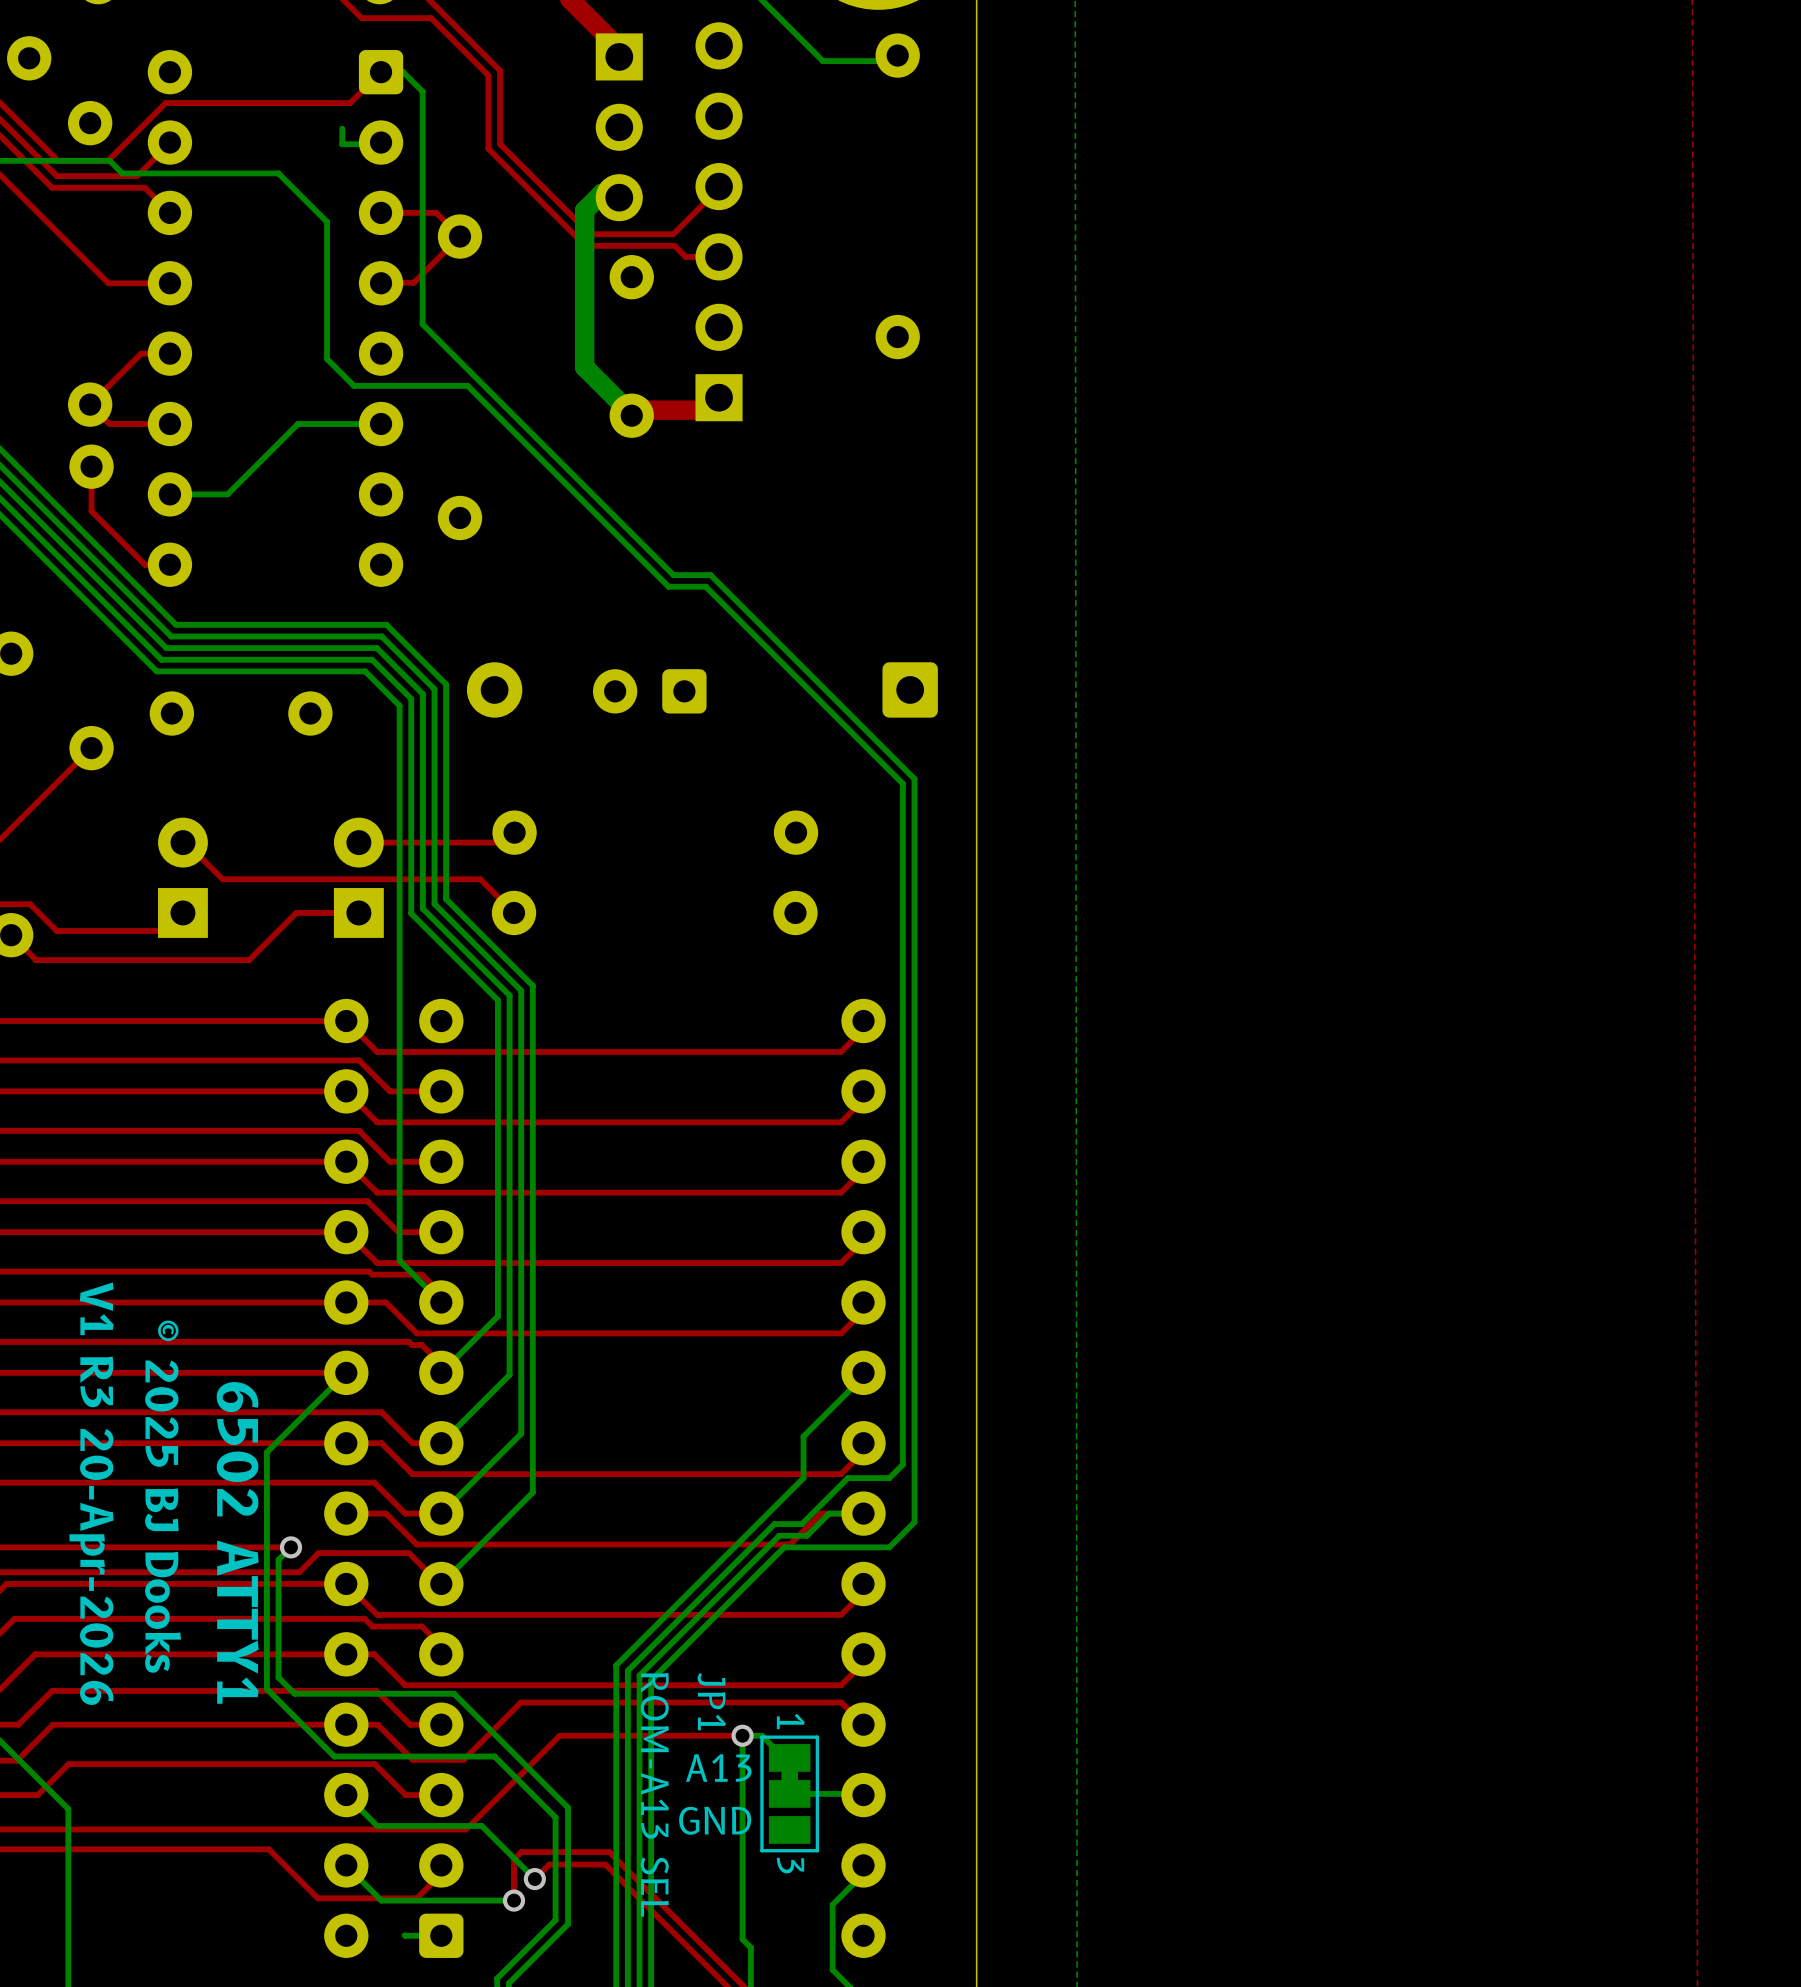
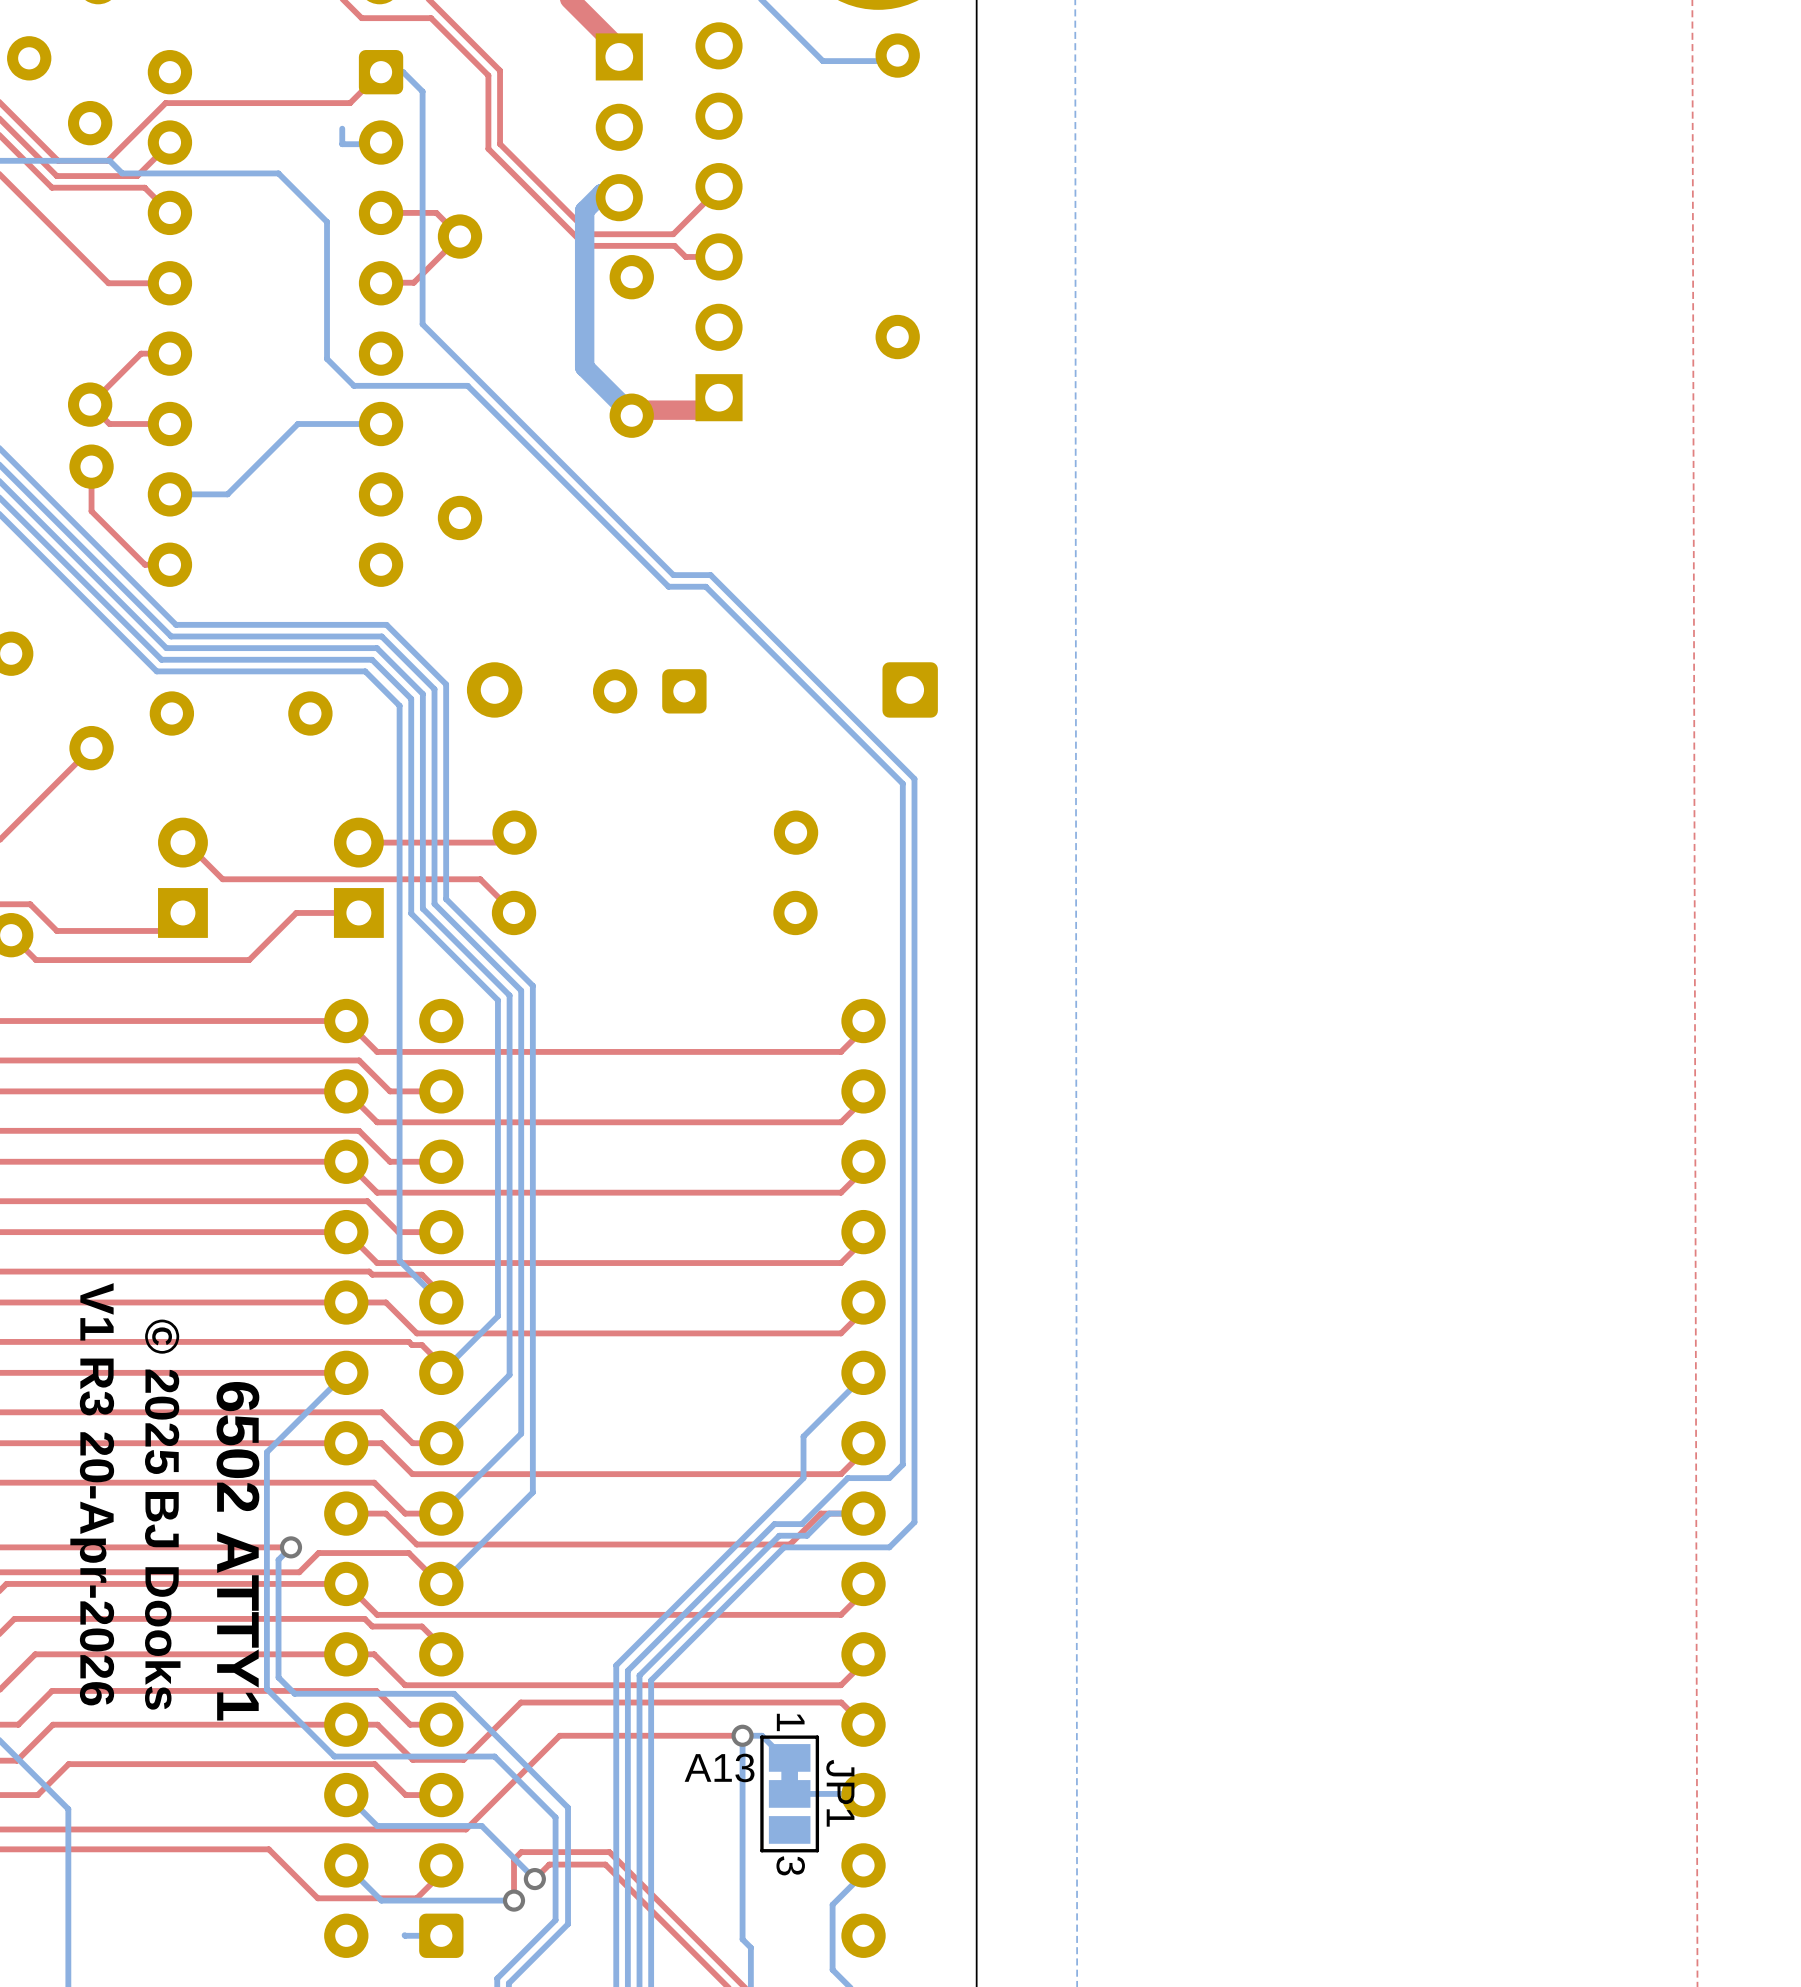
JP1 name position: JP1 (711, 1701) -> JP1 (840, 1793)
text: ROM-A13 SEL (654, 1794) -> none
text: GND (715, 1820) -> none

